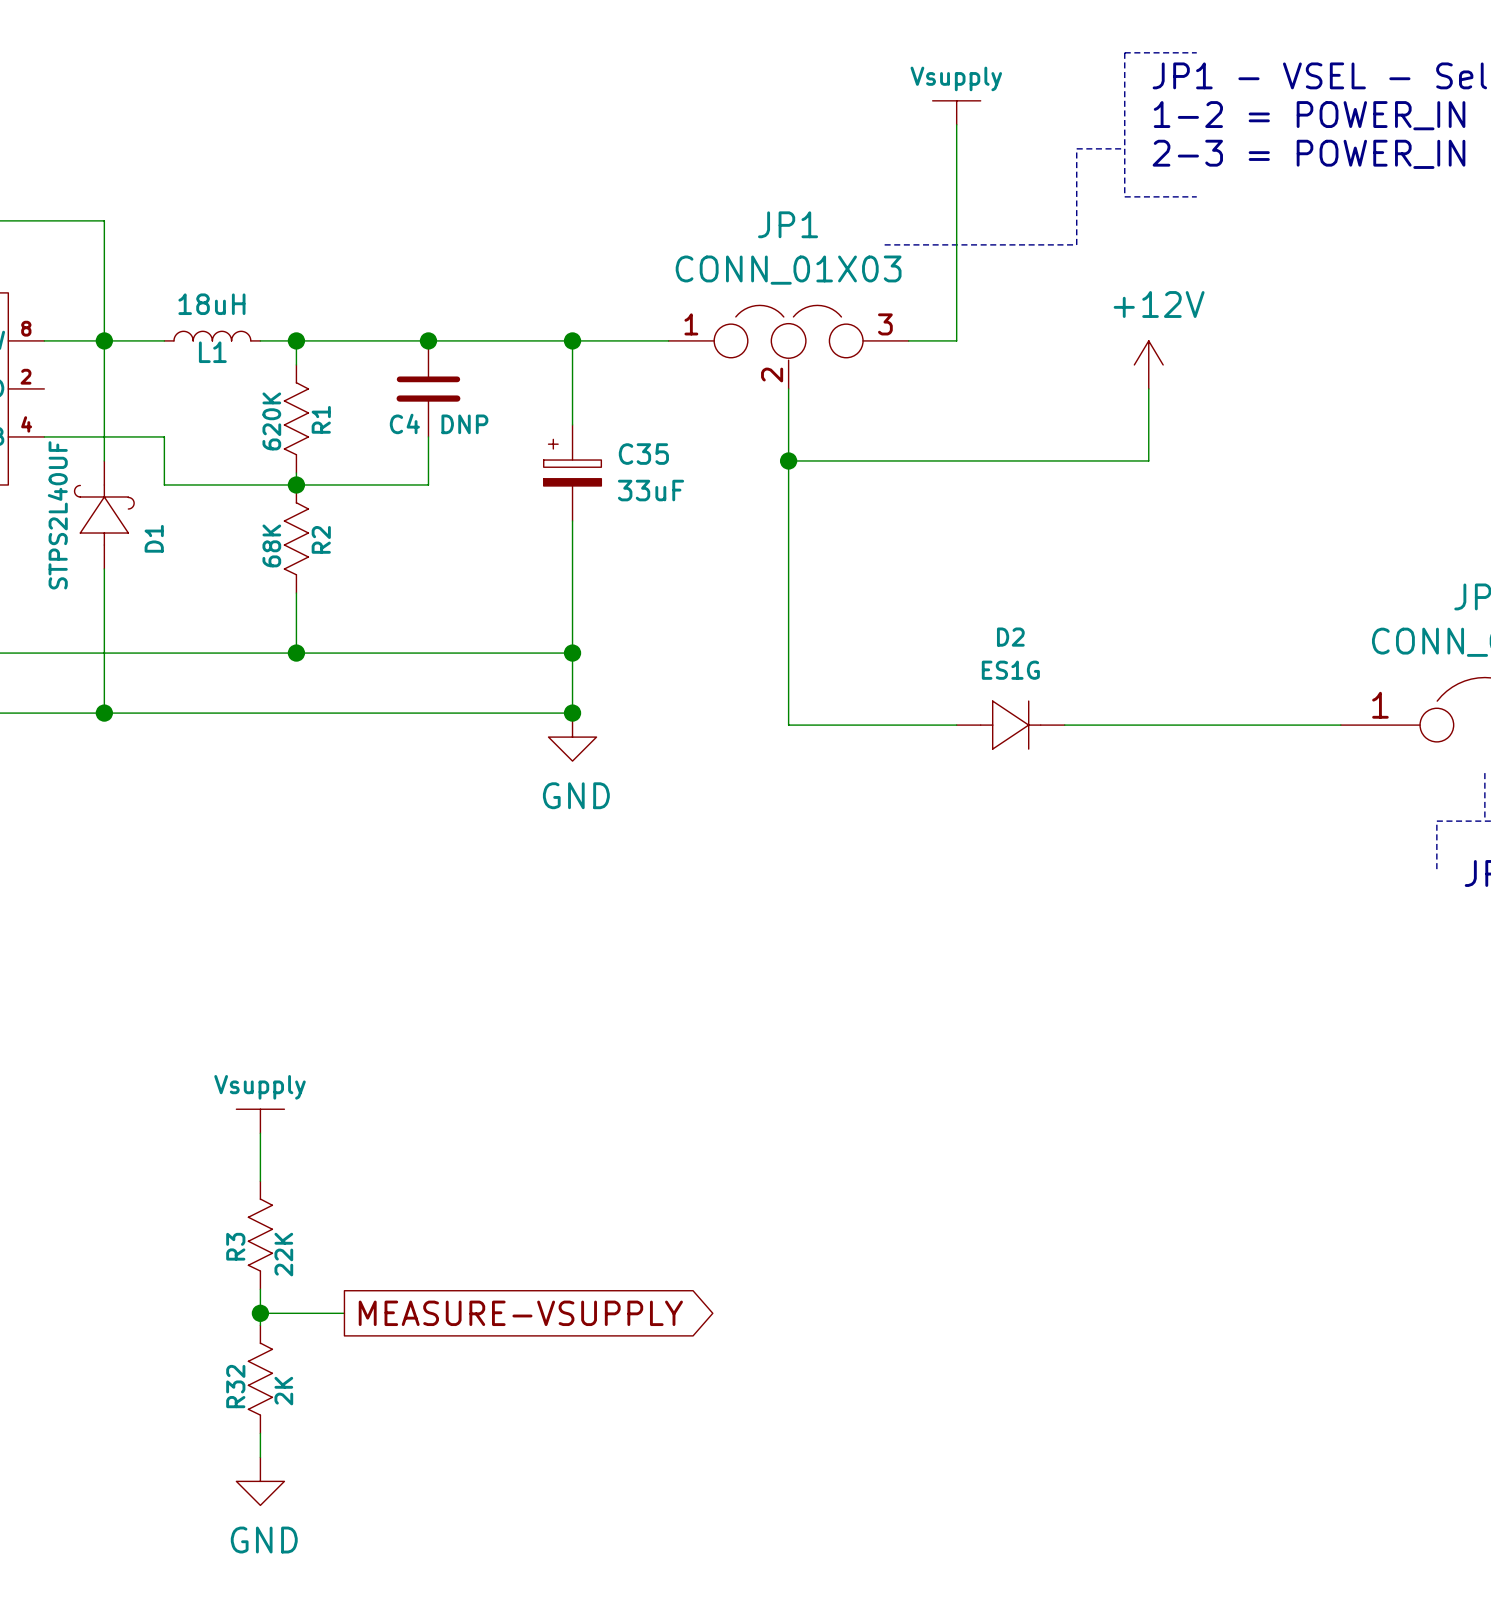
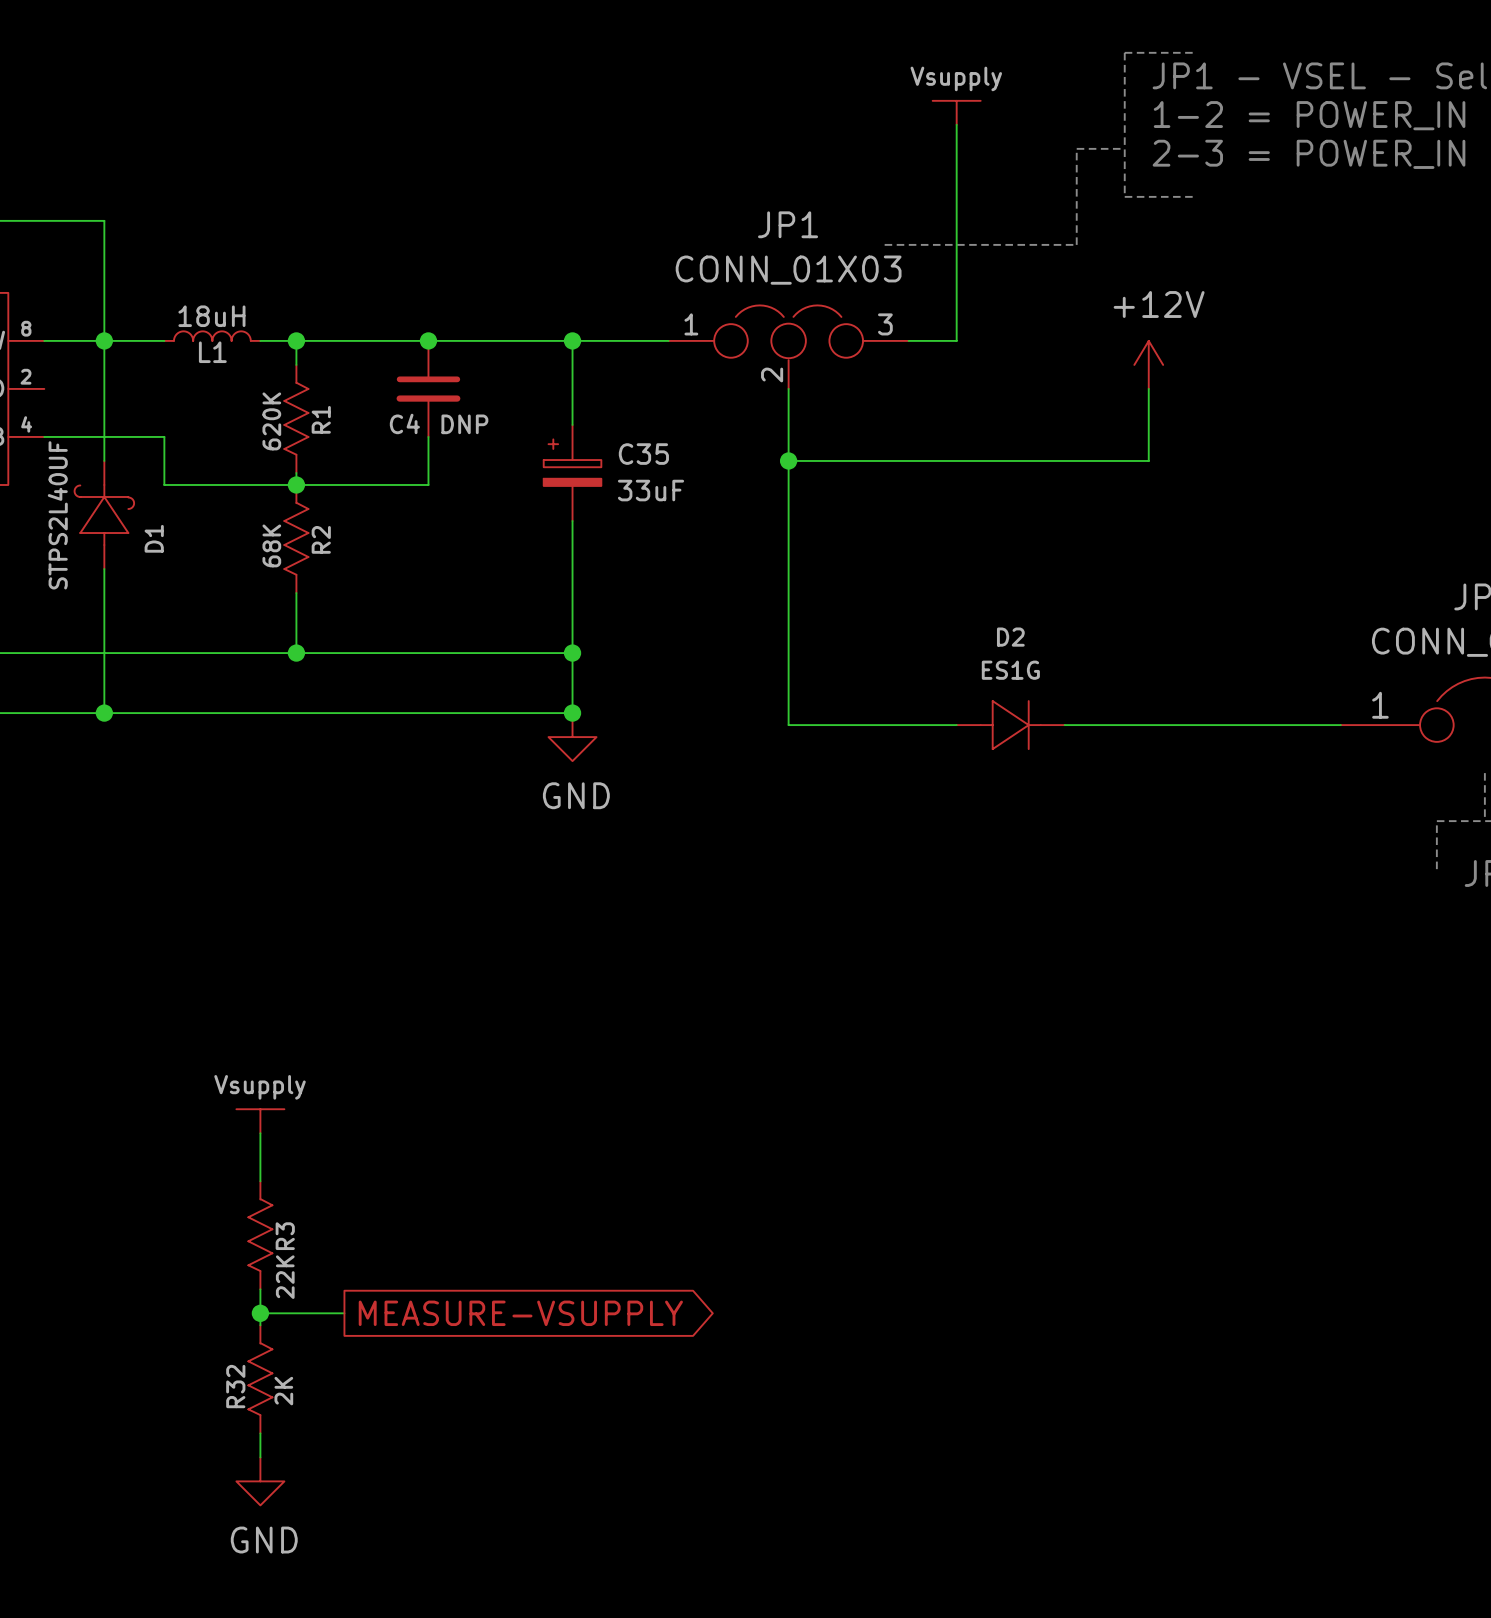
L1 value position: 18uH (211, 304) -> 18uH (211, 316)
R3 name position: R3 (235, 1246) -> R3 (285, 1236)
R3 value position: 22K (283, 1254) -> 22K (285, 1277)

